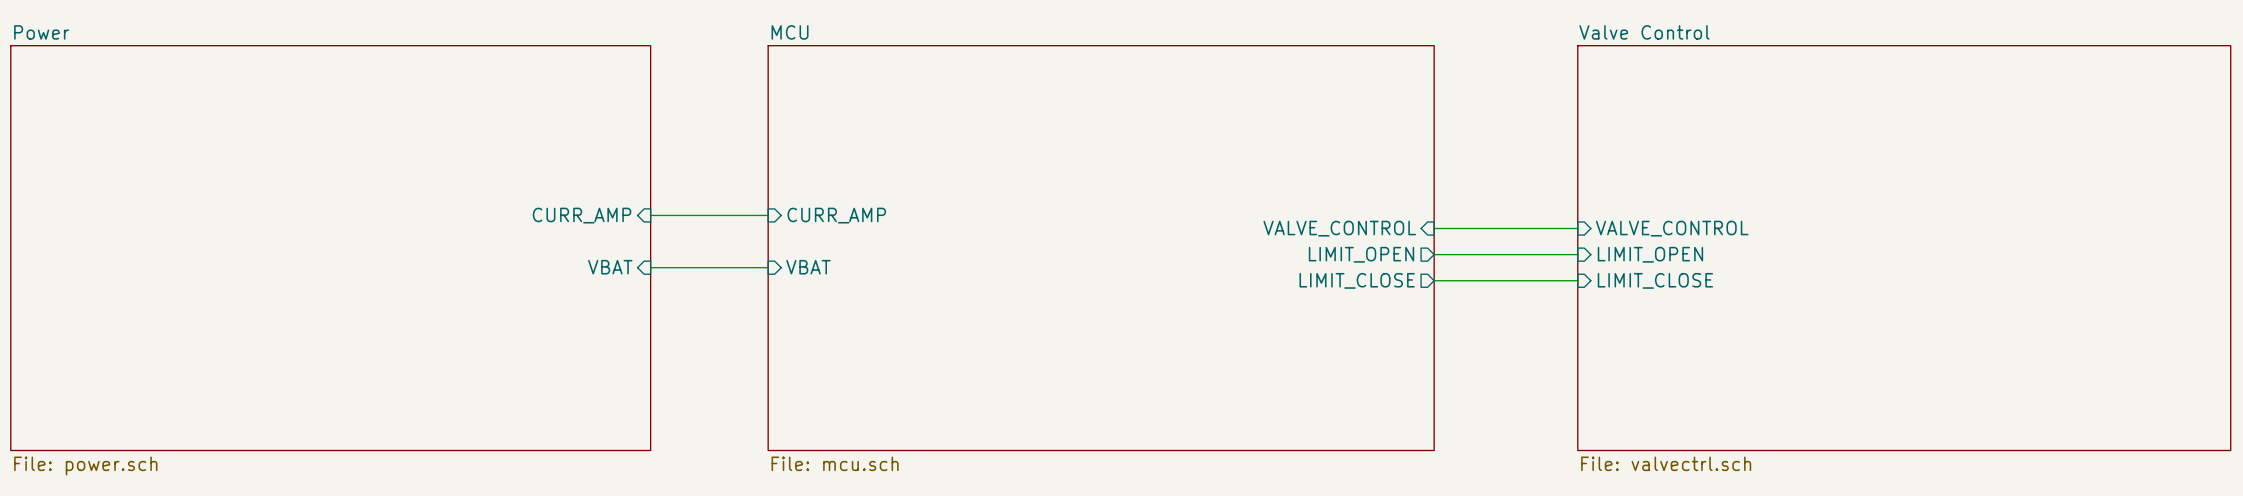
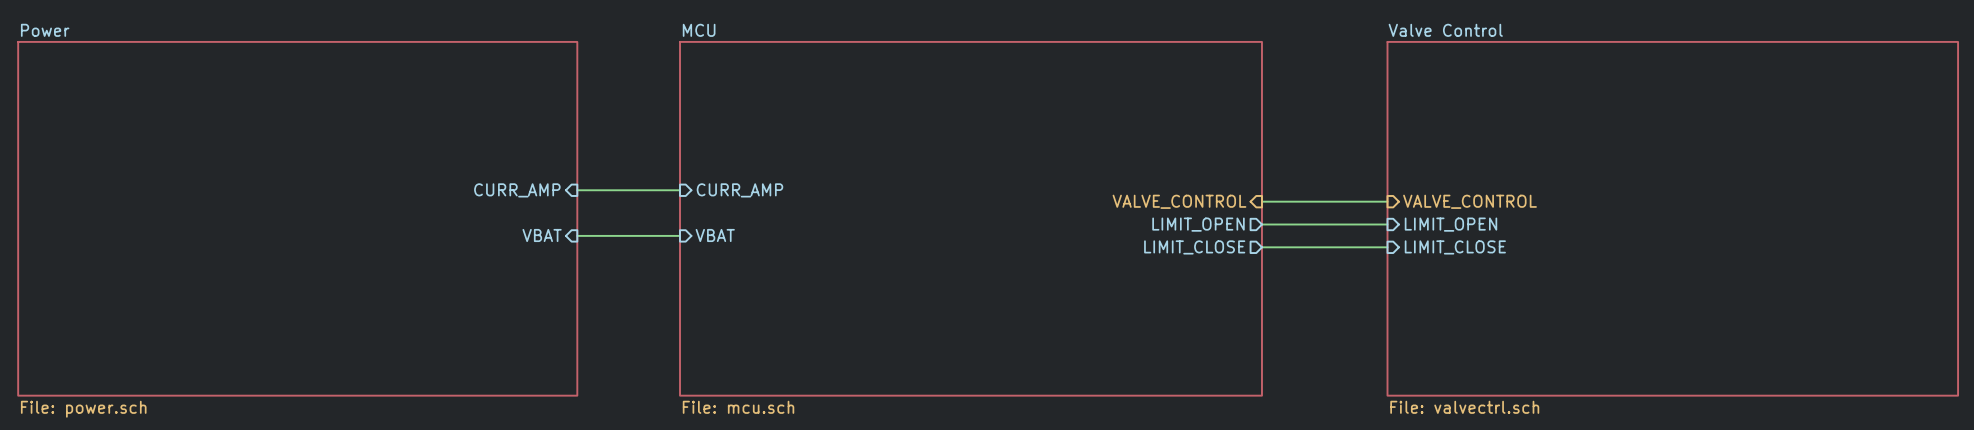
sheet pin: VALVE_CONTROL (1339, 228) -> none
hierarchical label: none -> VALVE_CONTROL (1179, 201)
sheet pin: VALVE_CONTROL (1672, 228) -> none
hierarchical label: none -> VALVE_CONTROL (1470, 201)

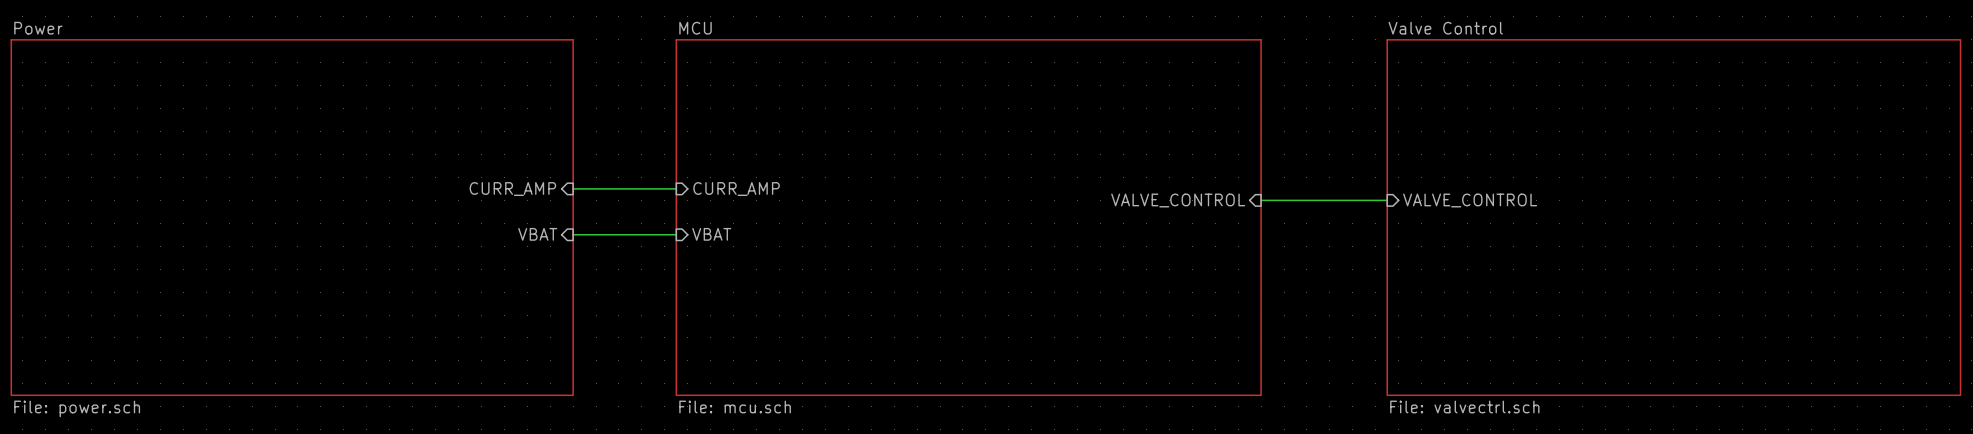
sheet pin: LIMIT_OPEN (1198, 224) -> none
wire: (1261, 224) (1387, 224) -> none
sheet pin: LIMIT_OPEN (1450, 224) -> none
sheet pin: LIMIT_CLOSE (1194, 247) -> none
wire: (1261, 247) (1387, 247) -> none
sheet pin: LIMIT_CLOSE (1455, 247) -> none

